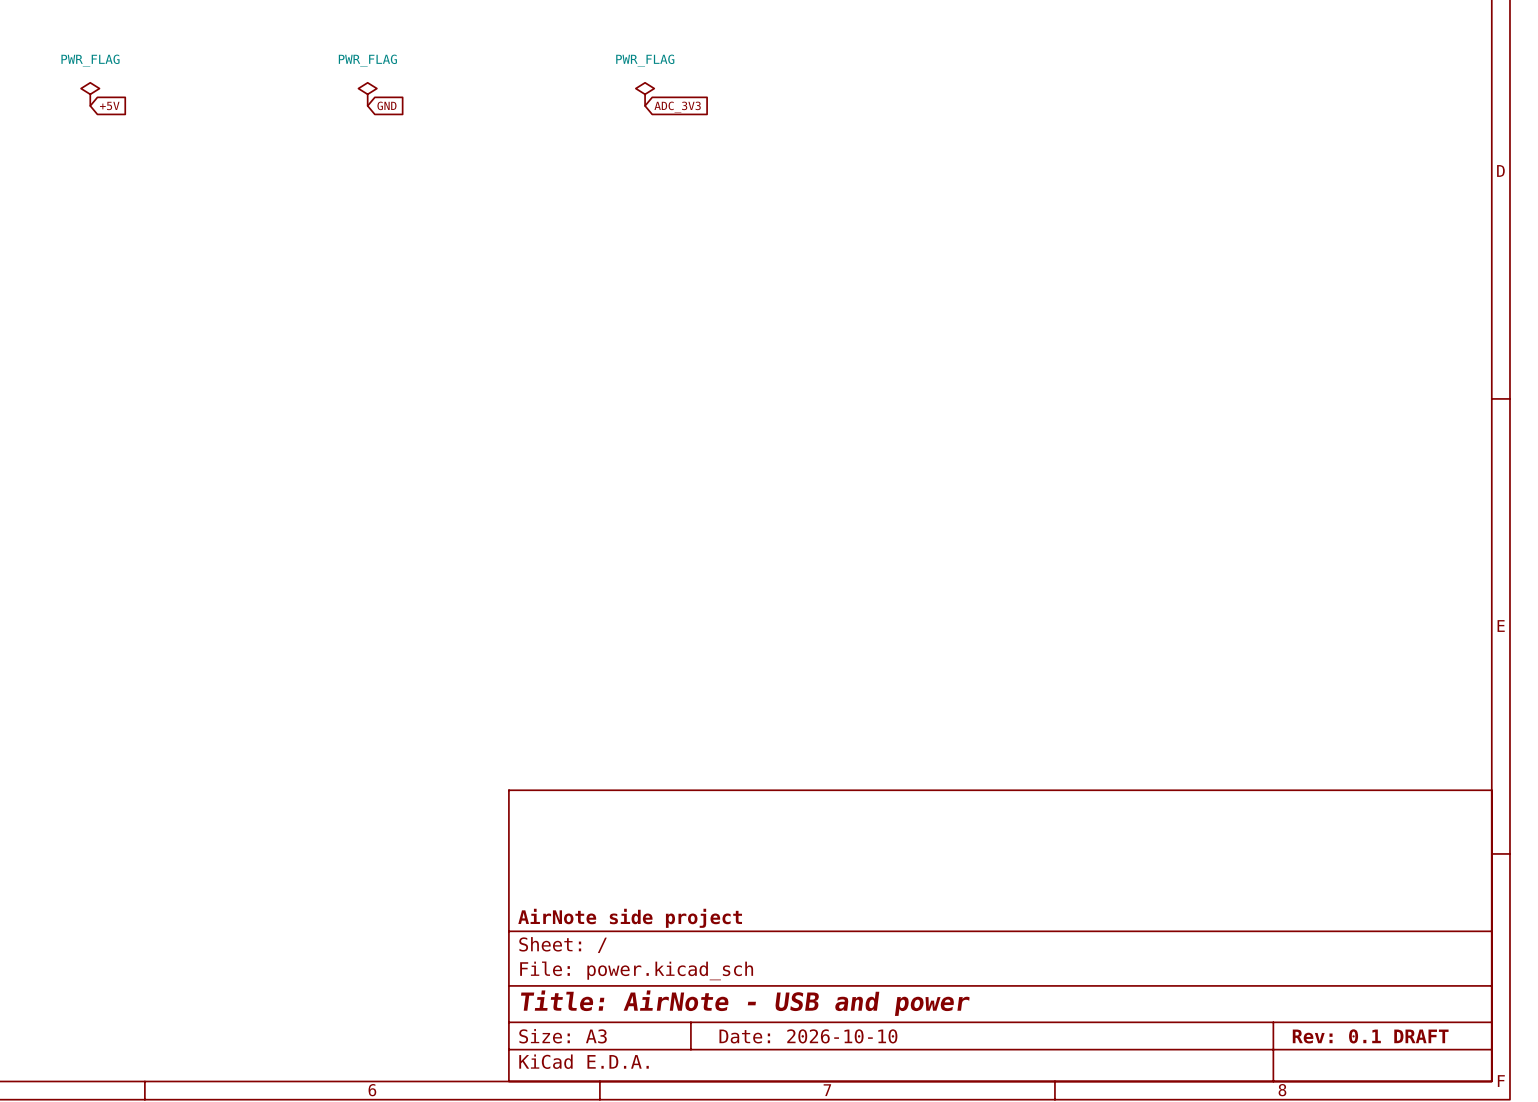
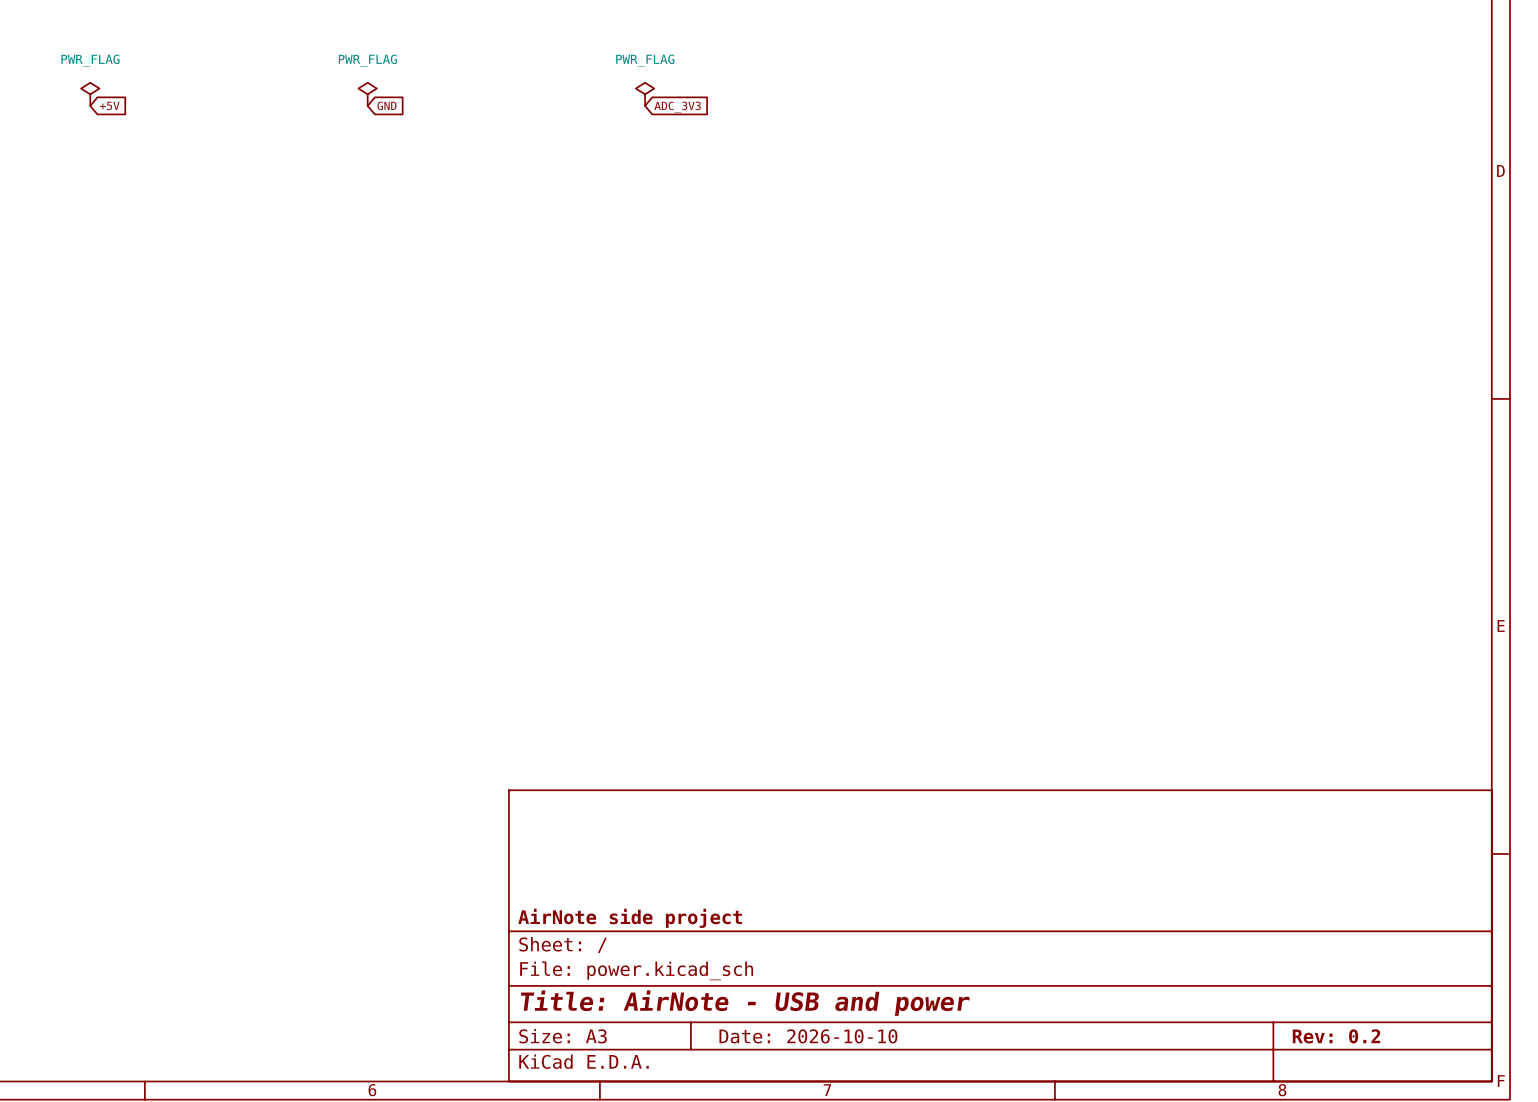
title block: Rev: 0.1 DRAFT (1370, 1036) -> Rev: 0.2 (1336, 1036)

